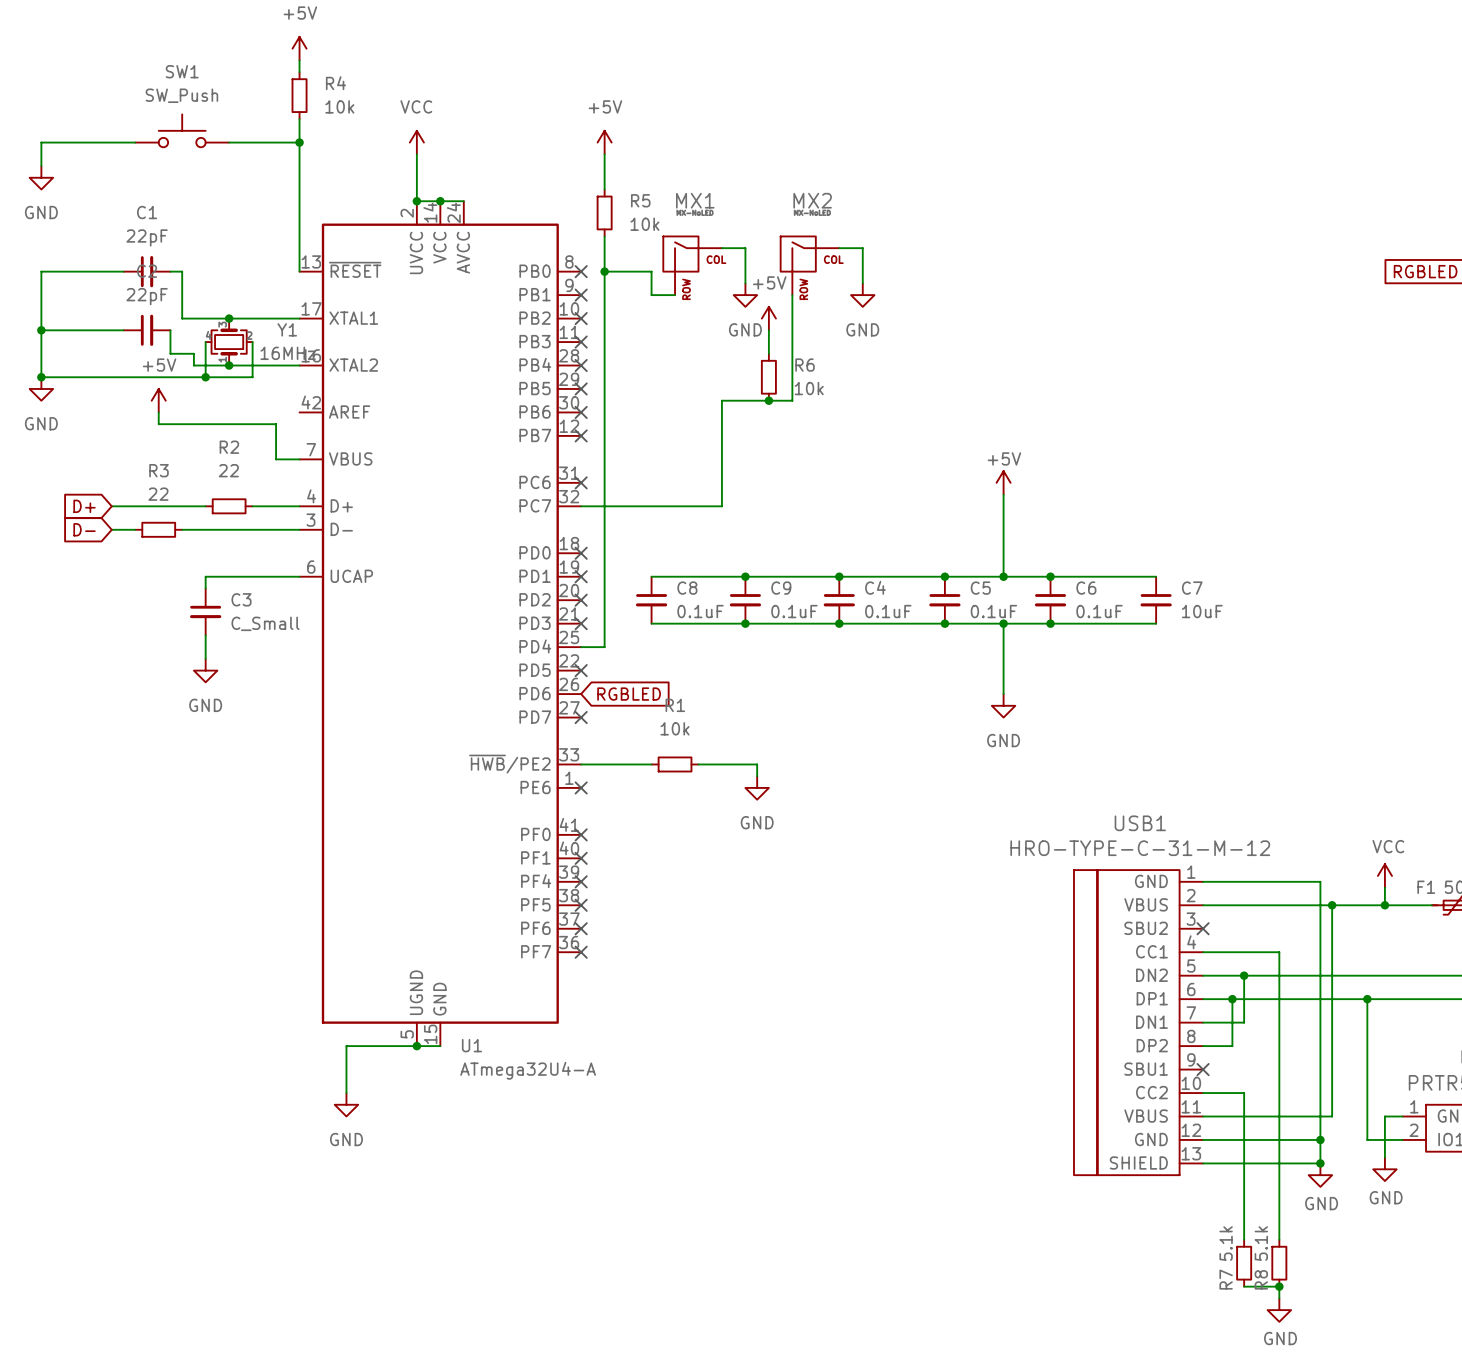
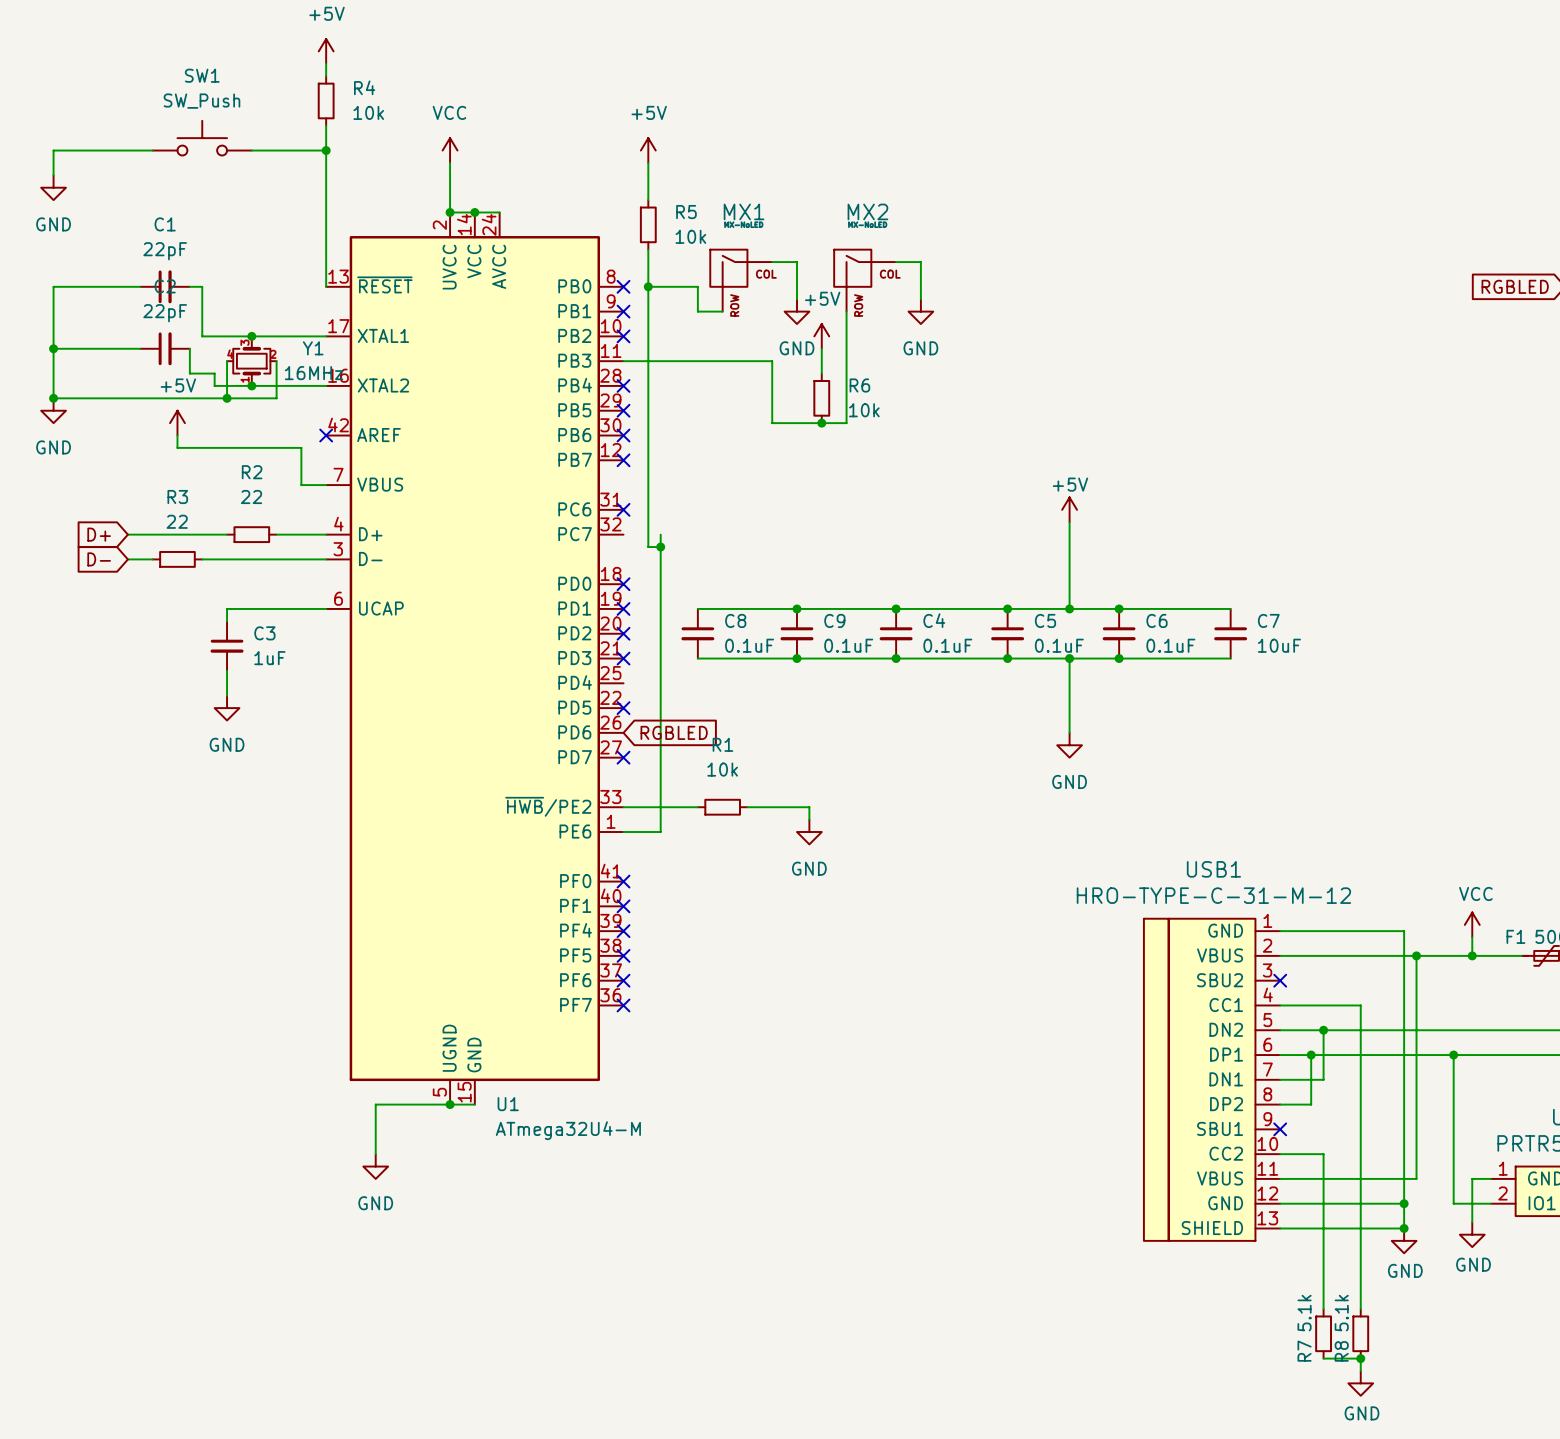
no-connect mark: (581, 342) -> none
wire: (721, 400) (721, 506) (581, 506) -> (772, 423) (772, 361) (623, 361)
no-connect mark: none -> (326, 435)
wire: none -> (660, 534) (660, 832) (623, 832)
wire: (604, 518) (604, 647) (581, 647) -> (648, 547) (660, 547)
junction: none -> (660, 547)
C3 value: C_Small (265, 623) -> 1uF (269, 658)
no-connect mark: (581, 787) -> none
U1 value: ATmega32U4-A (528, 1070) -> ATmega32U4-M (568, 1130)

